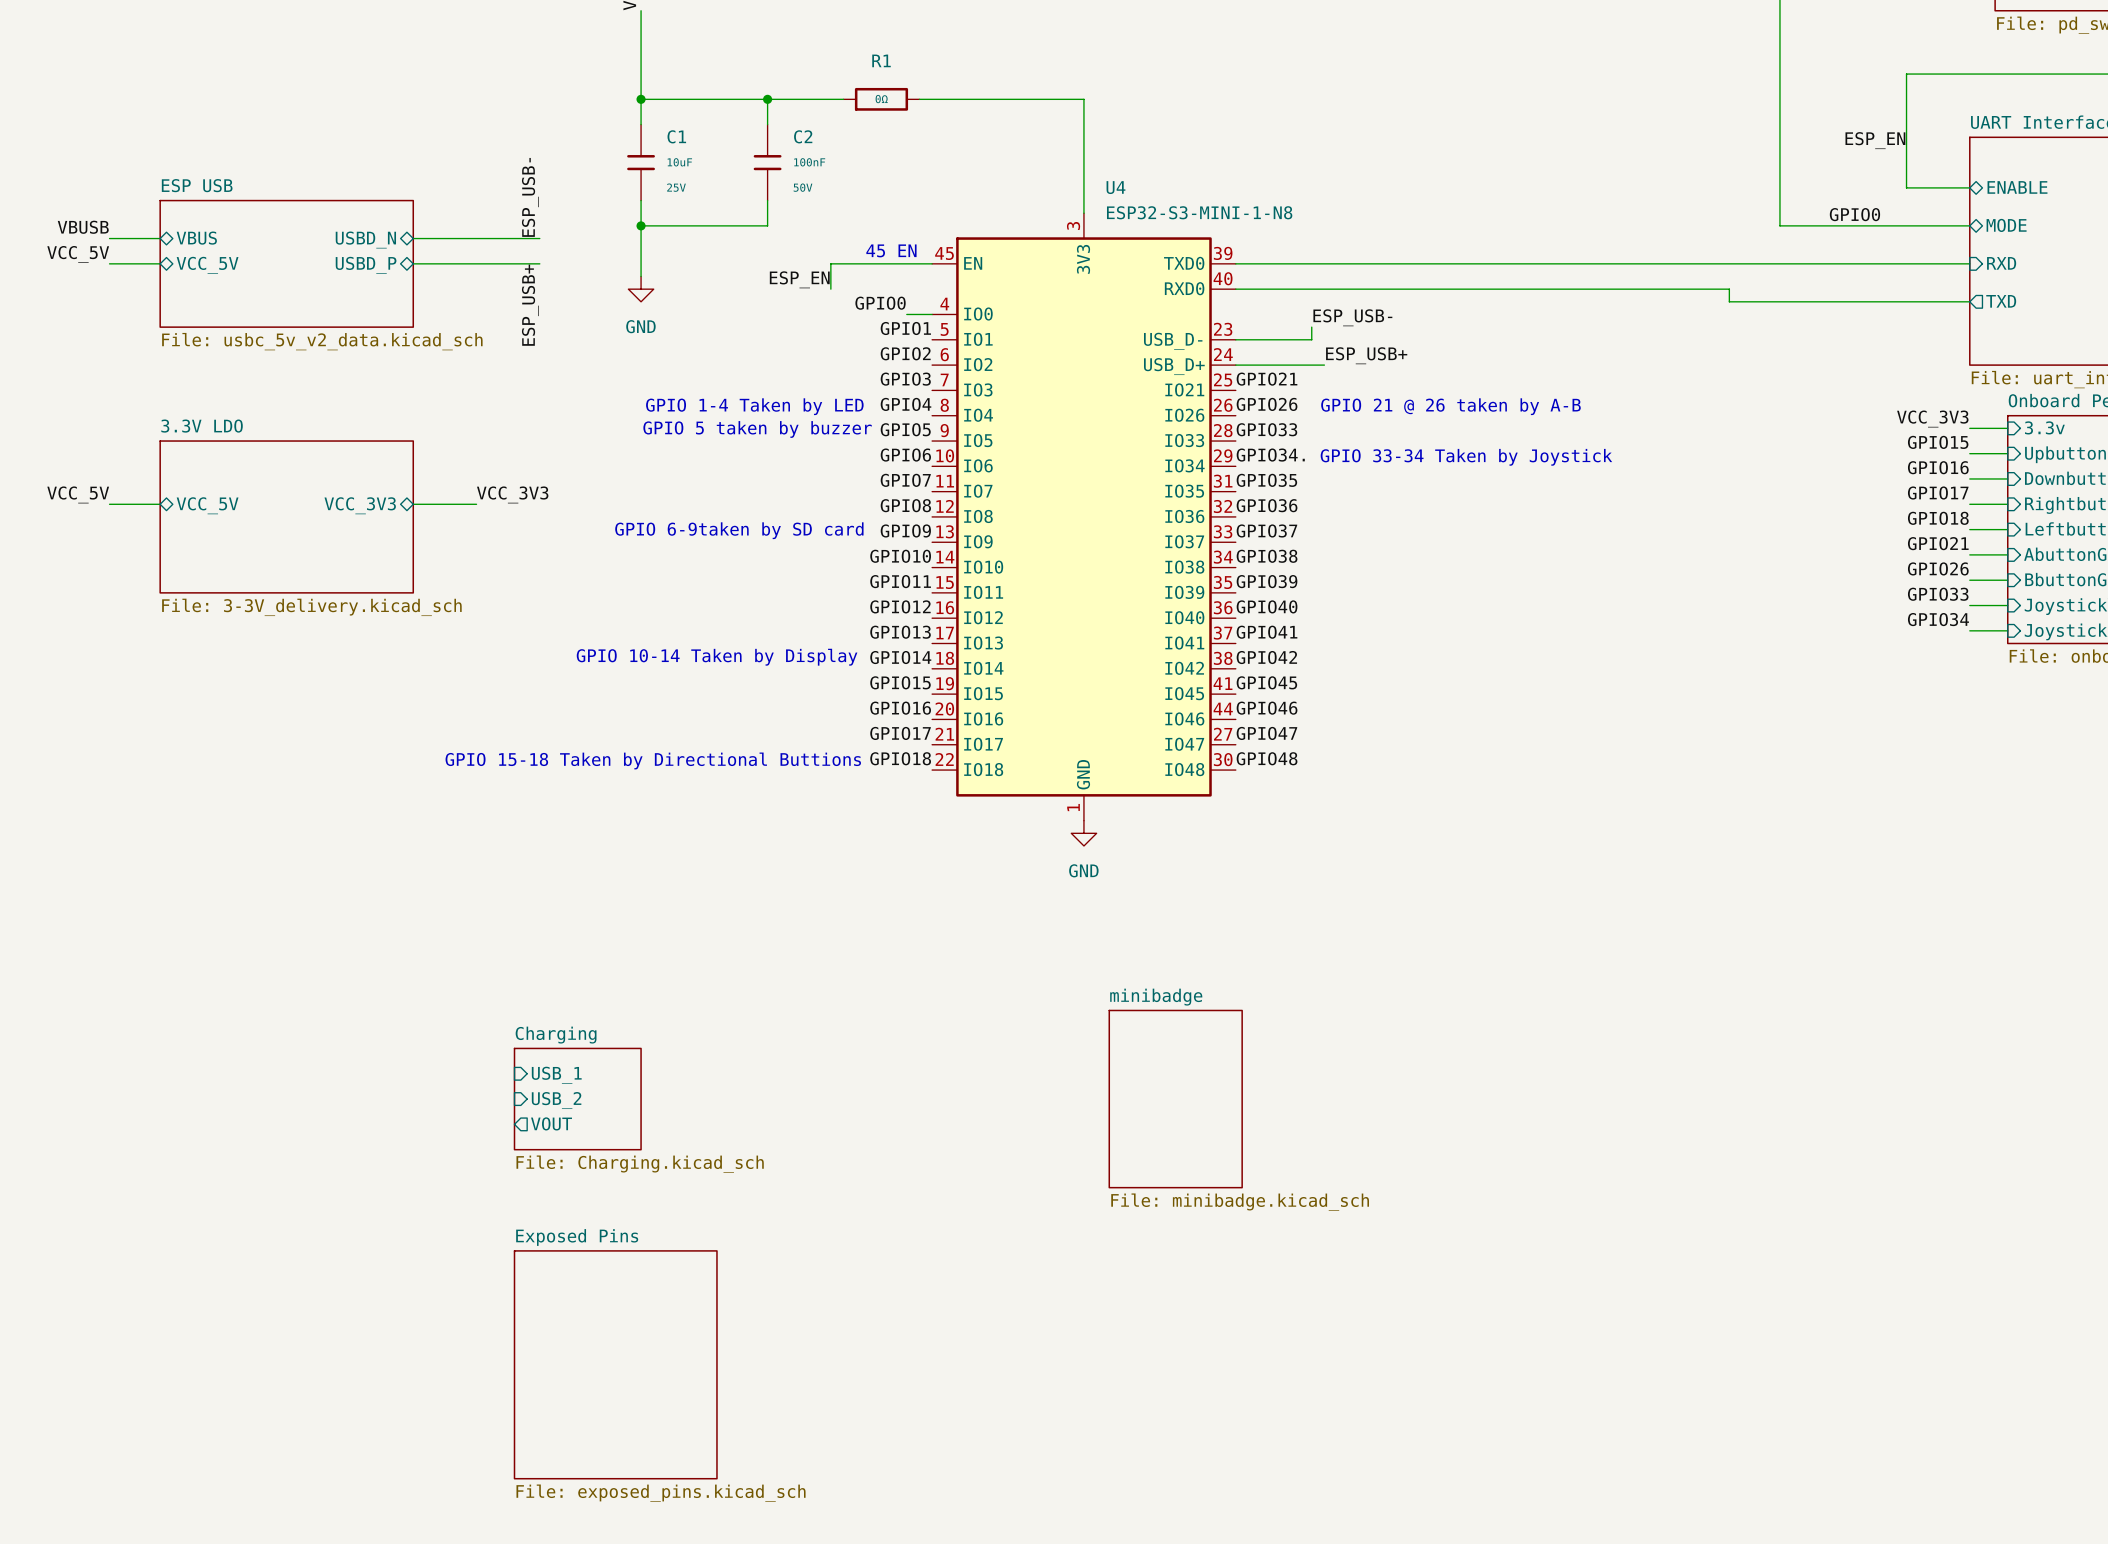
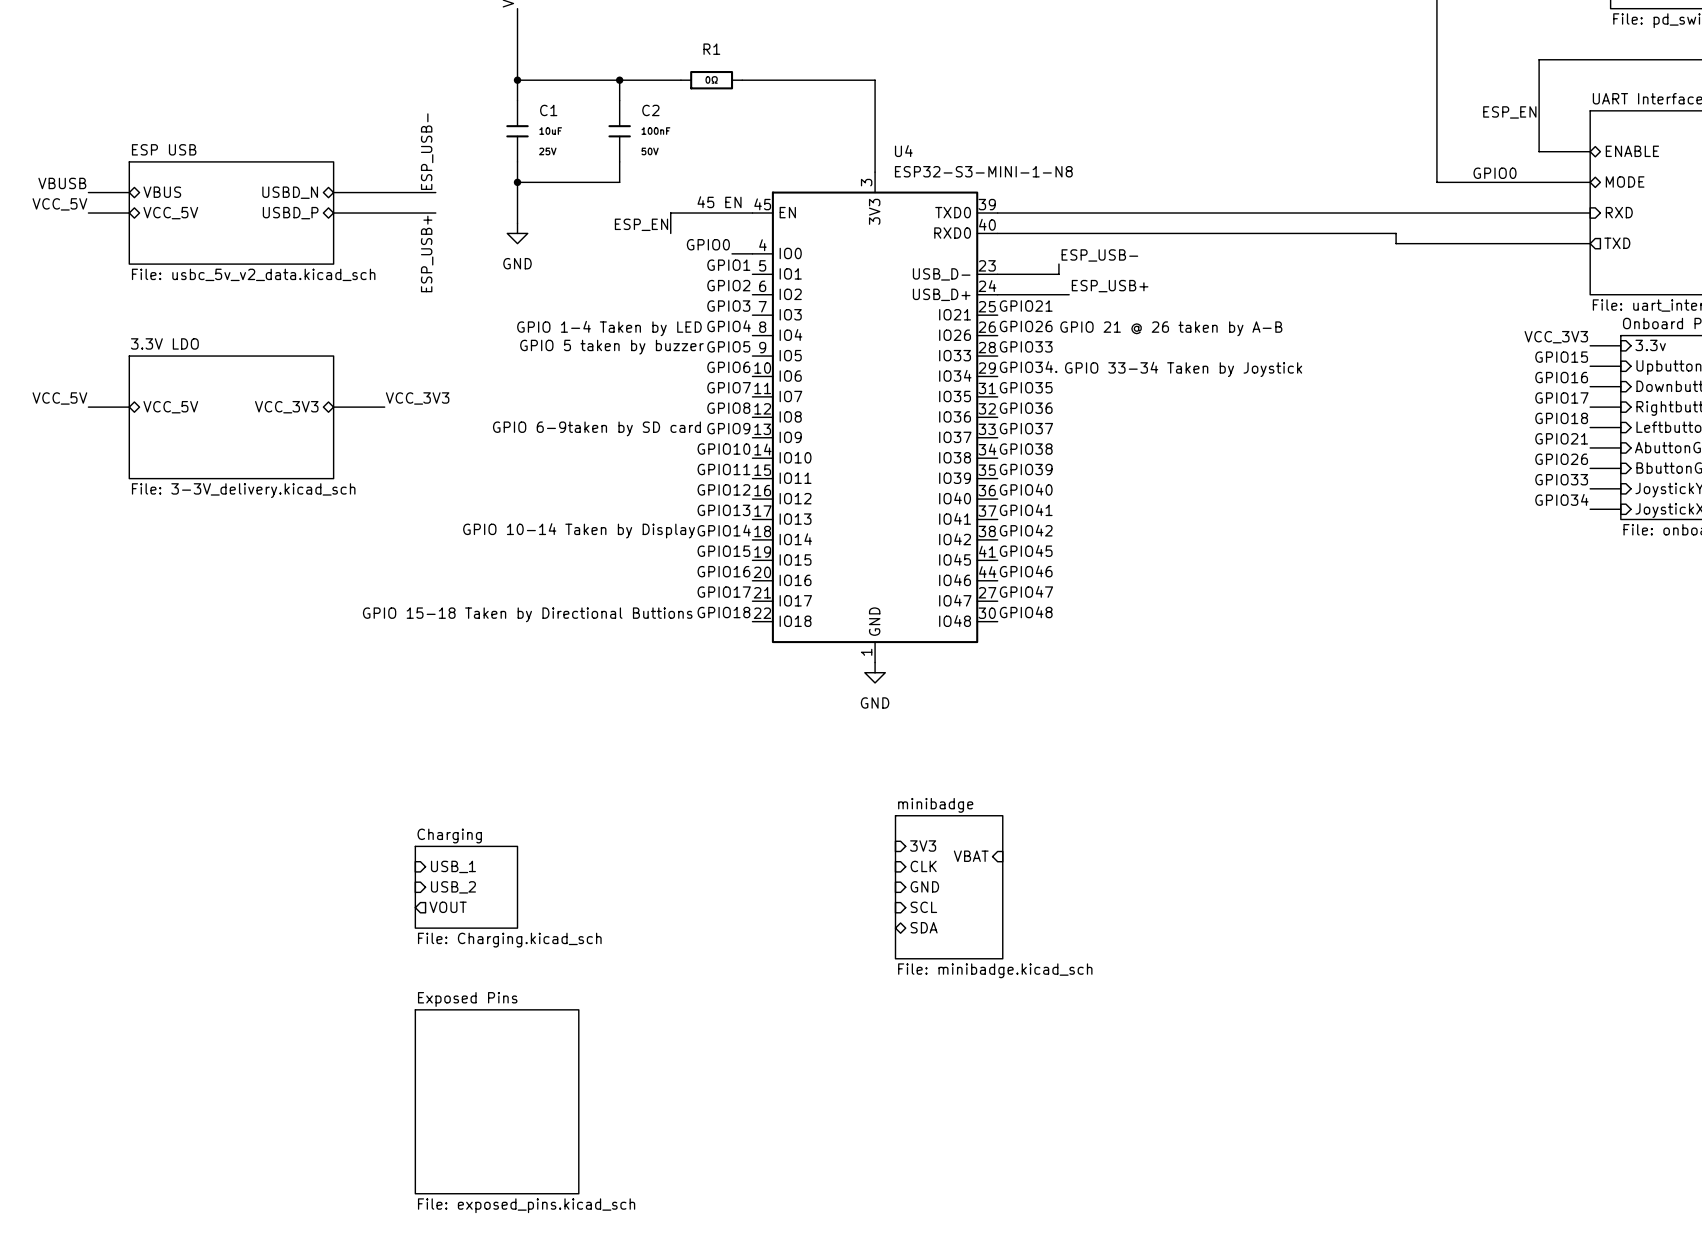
sheet pin: none -> 3V3 (923, 846)
sheet pin: none -> VBAT (971, 856)
sheet pin: none -> CLK (923, 866)
sheet pin: none -> GND (924, 886)
sheet pin: none -> SCL (923, 907)
sheet pin: none -> SDA (924, 927)

